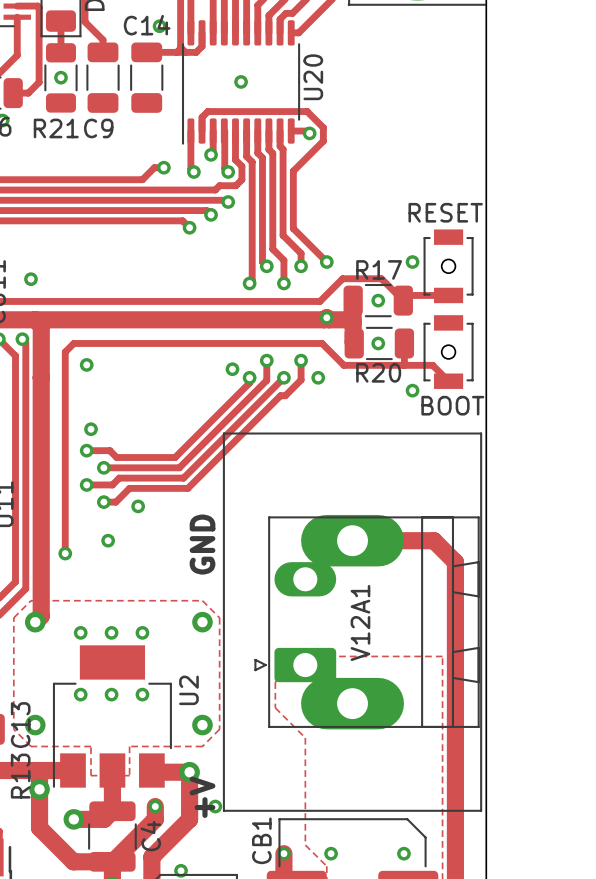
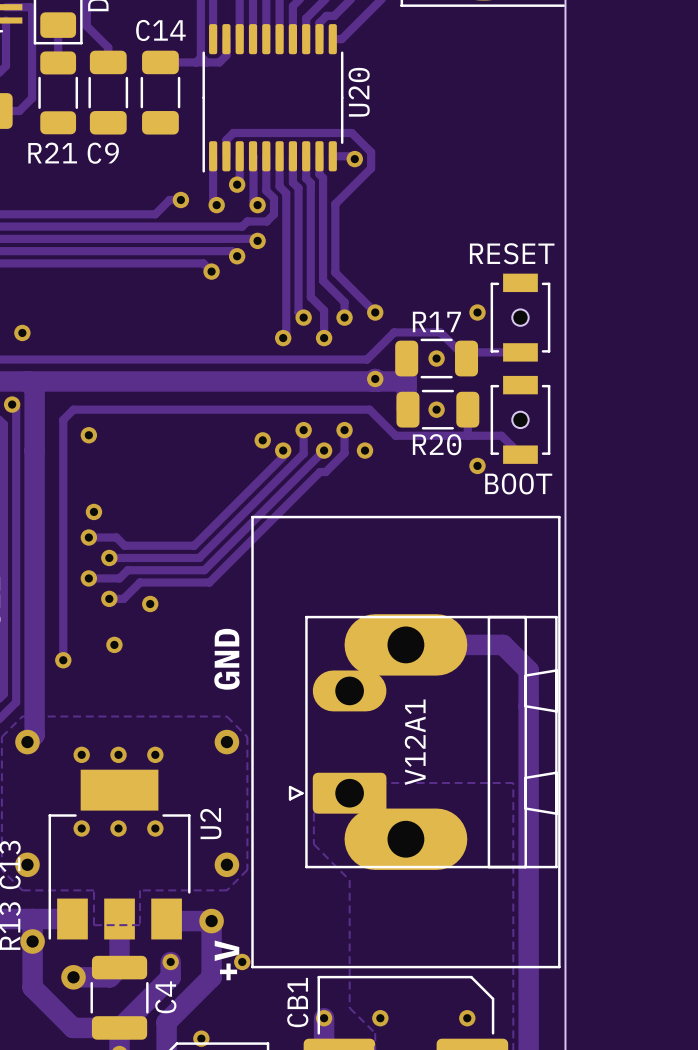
via: (159, 26) -> none
via: (60, 77) -> none
via: (241, 81) -> none

